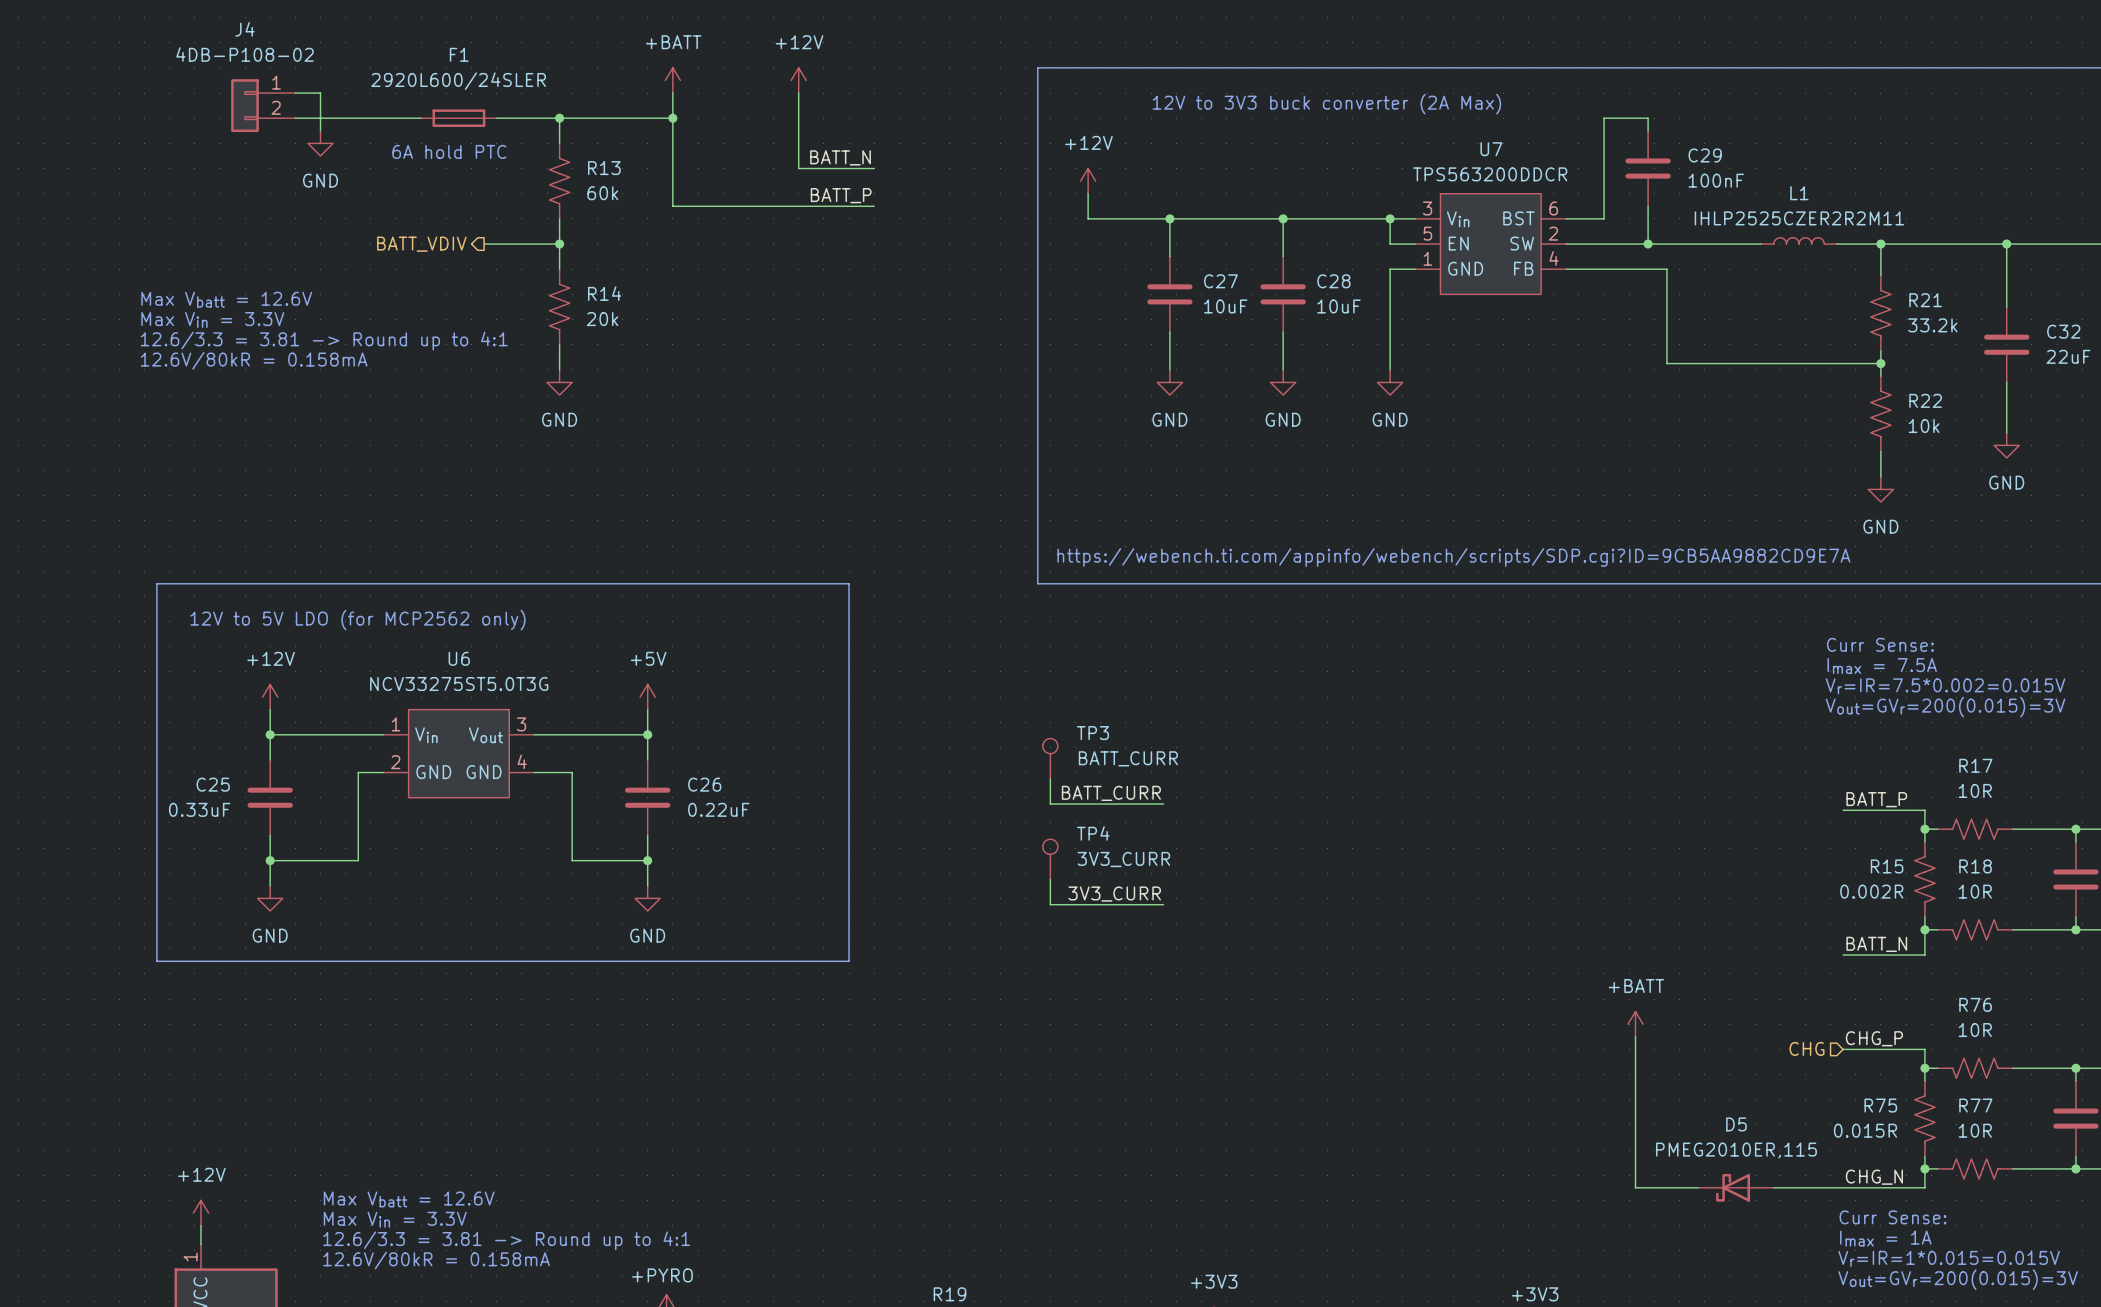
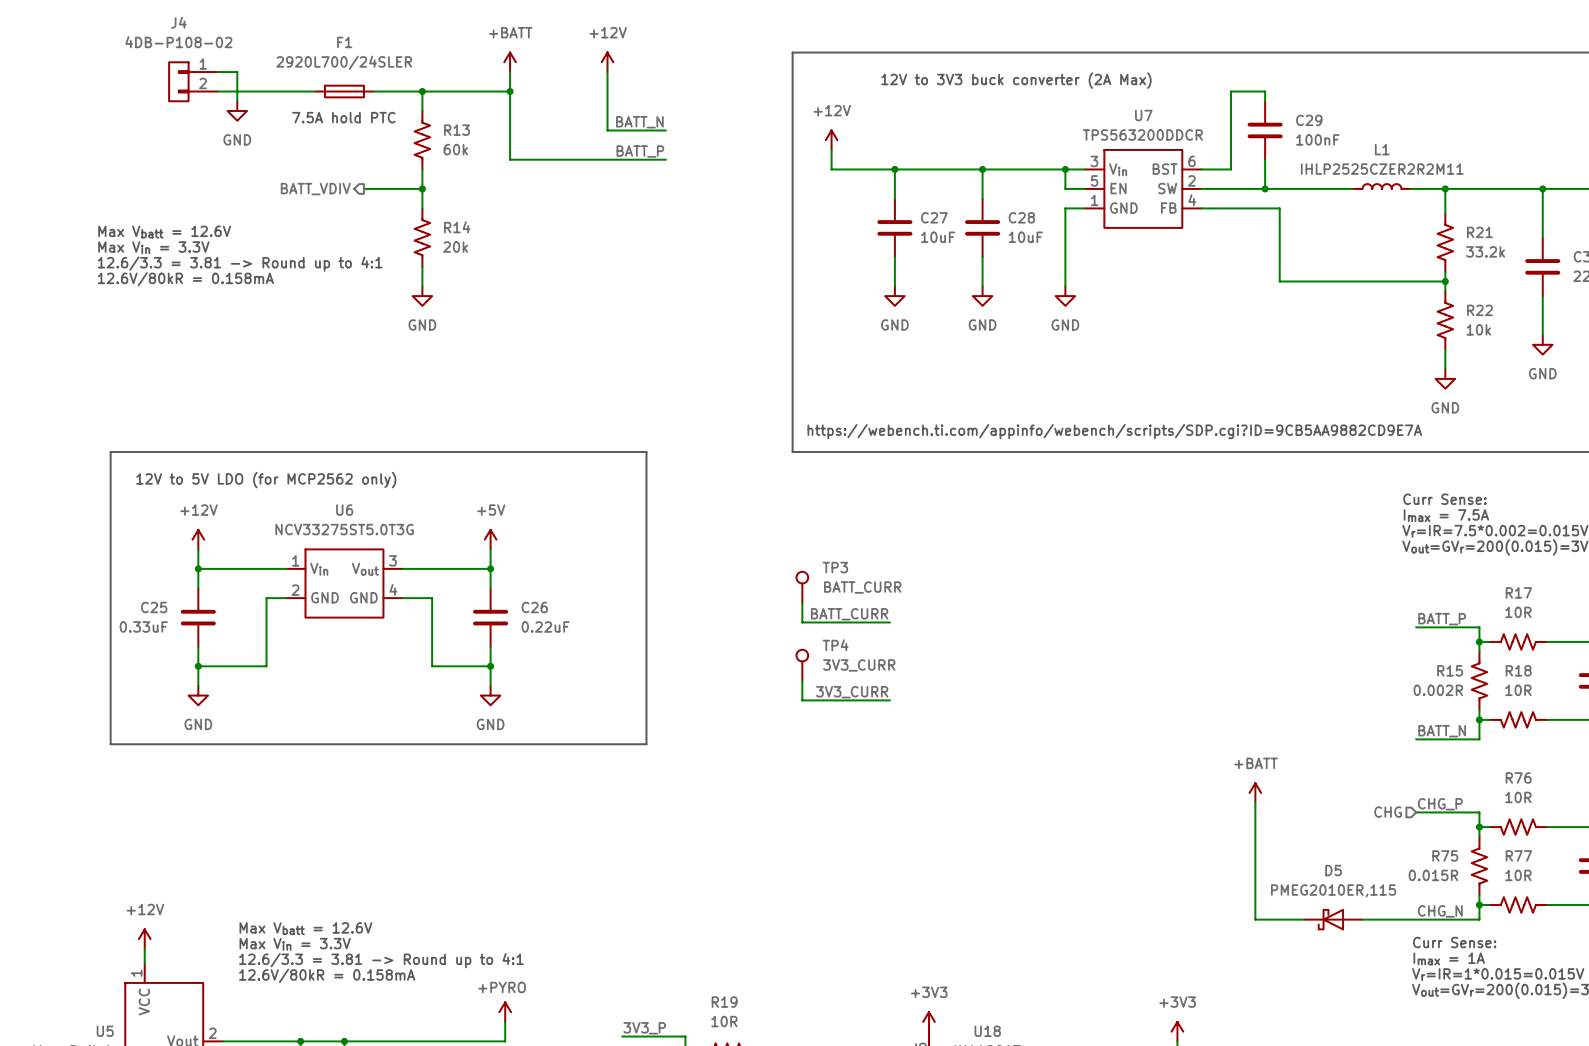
F1 value: 2920L600/24SLER (458, 81) -> 2920L700/24SLER (344, 62)
text: 6A hold PTC (449, 151) -> 7.5A hold PTC (343, 117)

